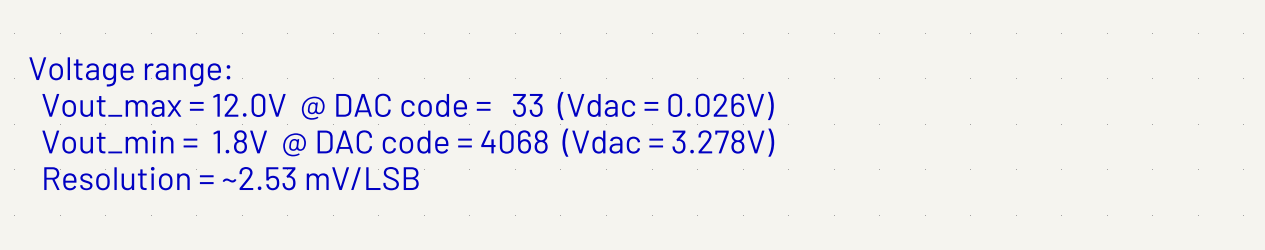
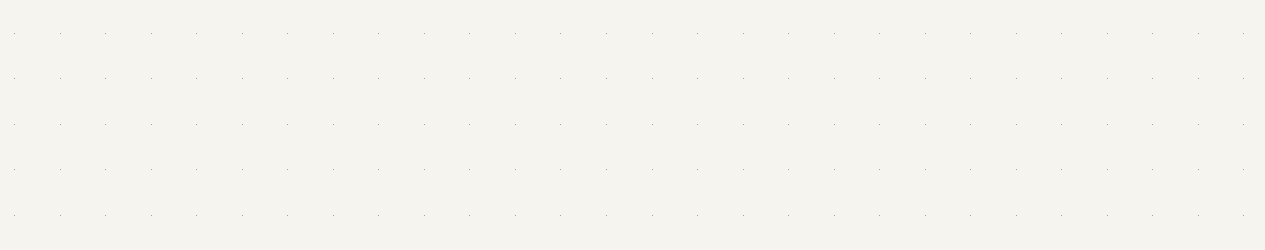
text: Voltage range: (129, 71) -> none
text: Vout_max = 12.0V @ DAC code = 33 (Vdac = 0.026V) (408, 105) -> none
text: Vout_min = 1.8V @ DAC code = 4068 (Vdac = 3.278V) (408, 142) -> none
text: Resolution = ~2.53 mV/LSB (231, 178) -> none

